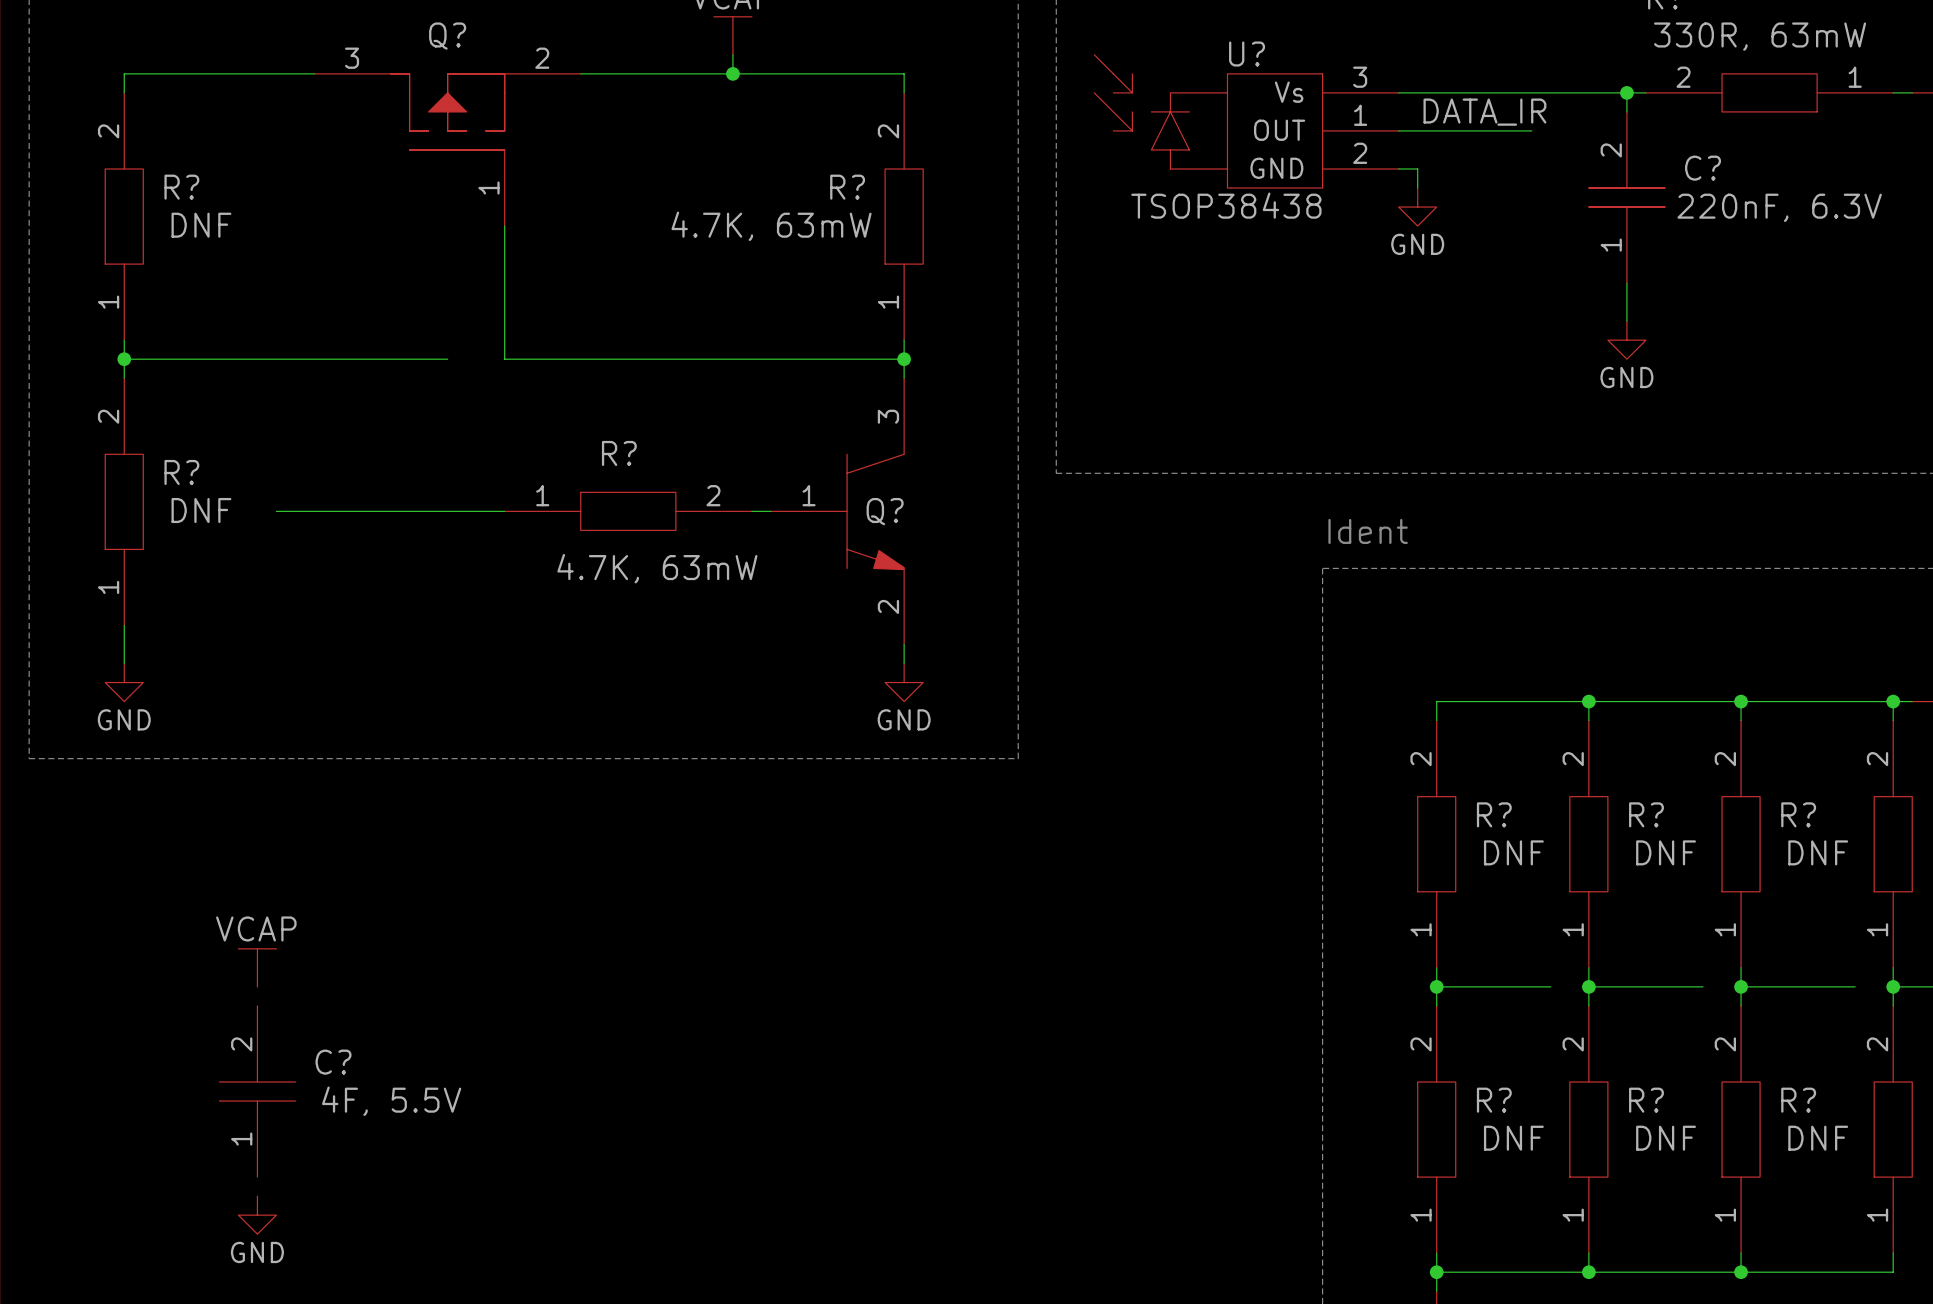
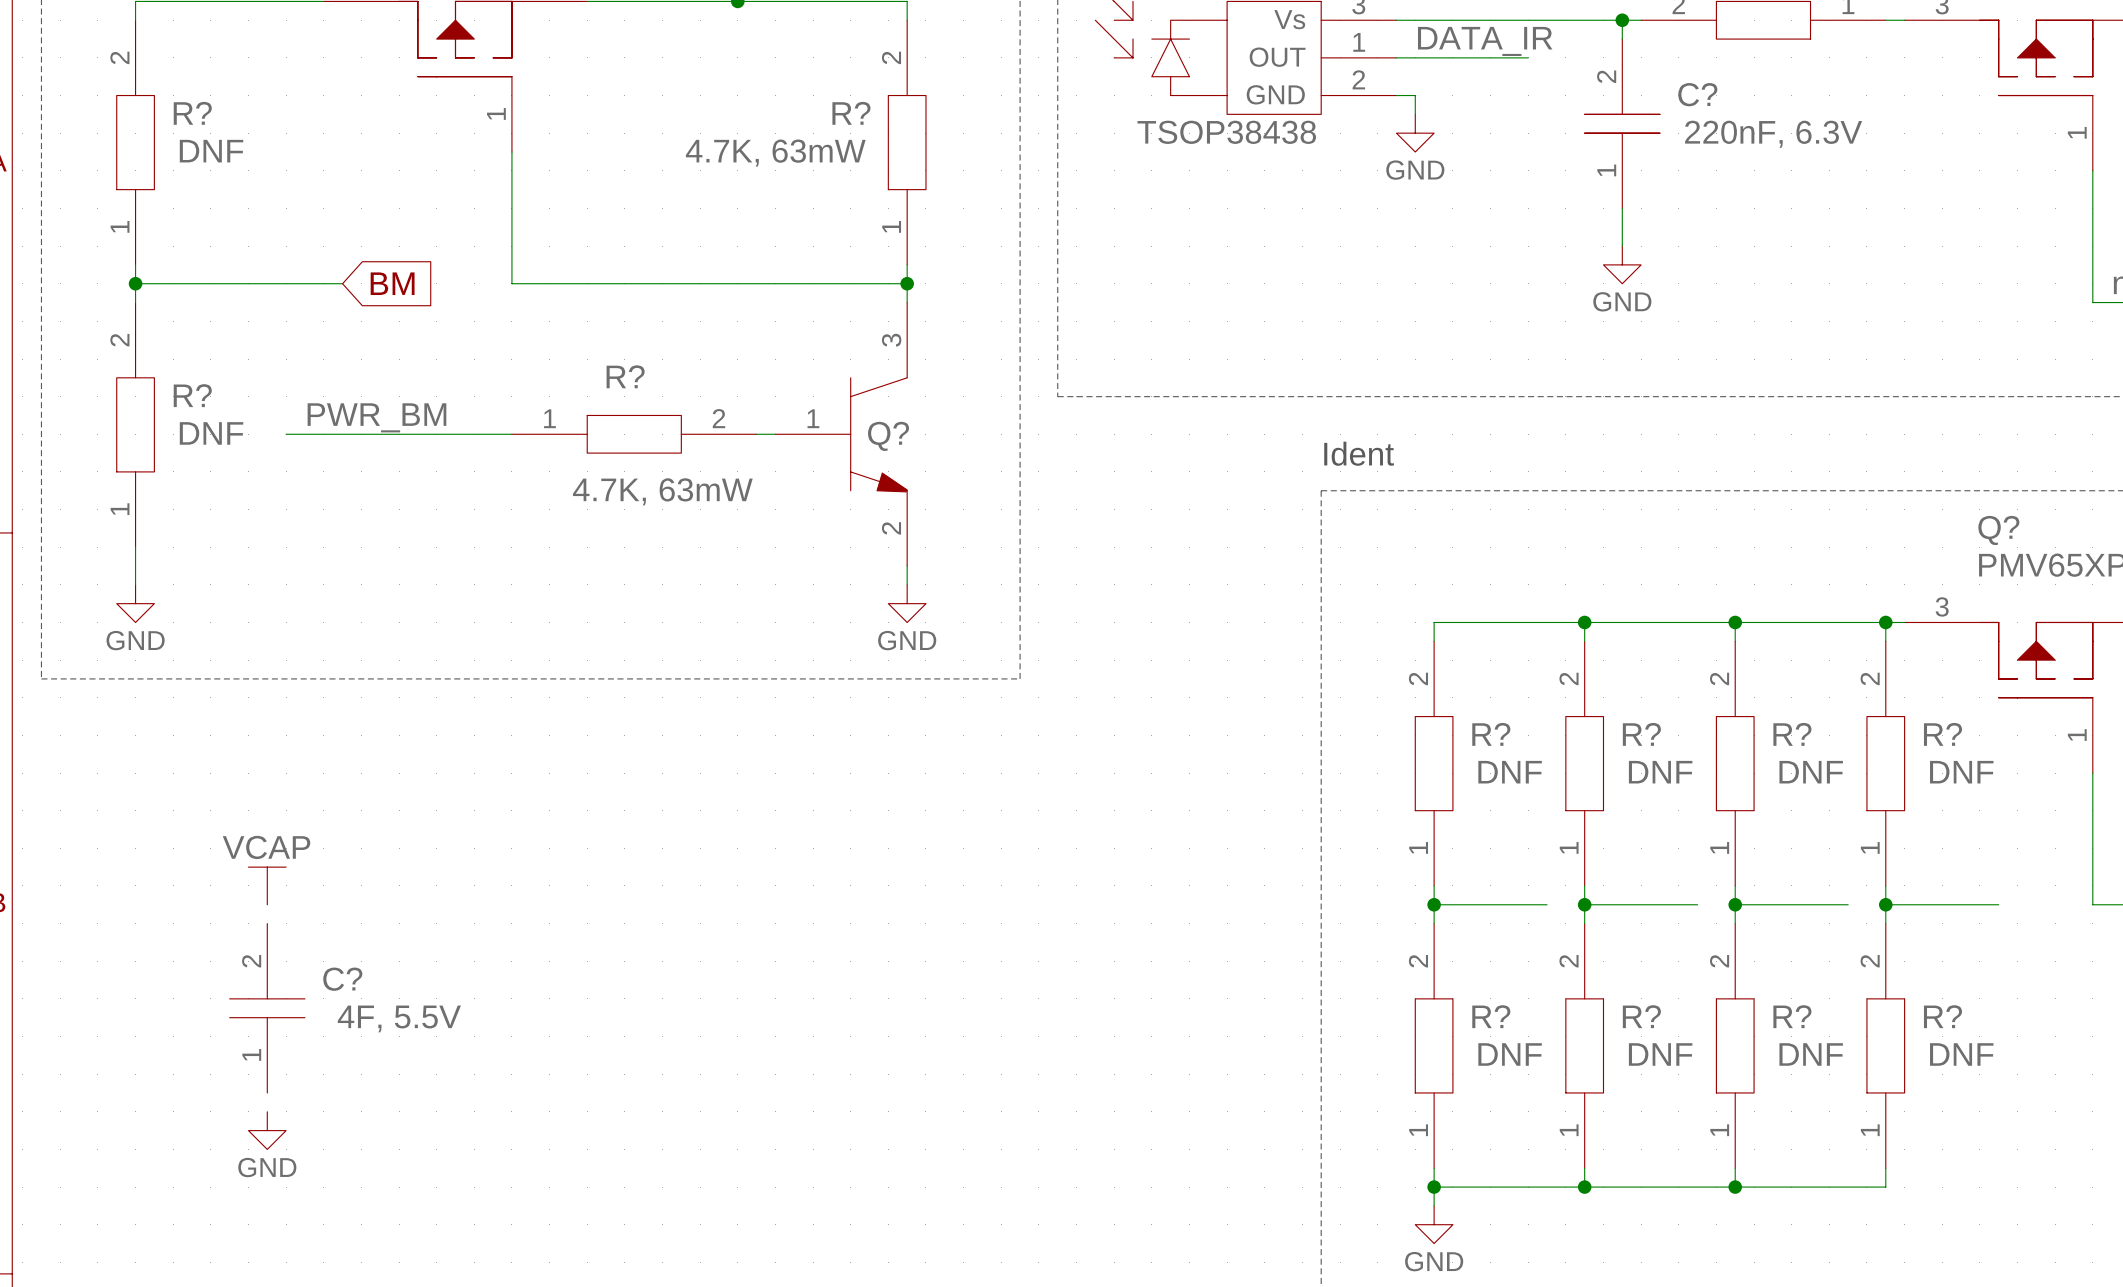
wire: (333, 359) (447, 359) -> none
global label: none -> BM (392, 283)
label: none -> PWR_BM (376, 417)

